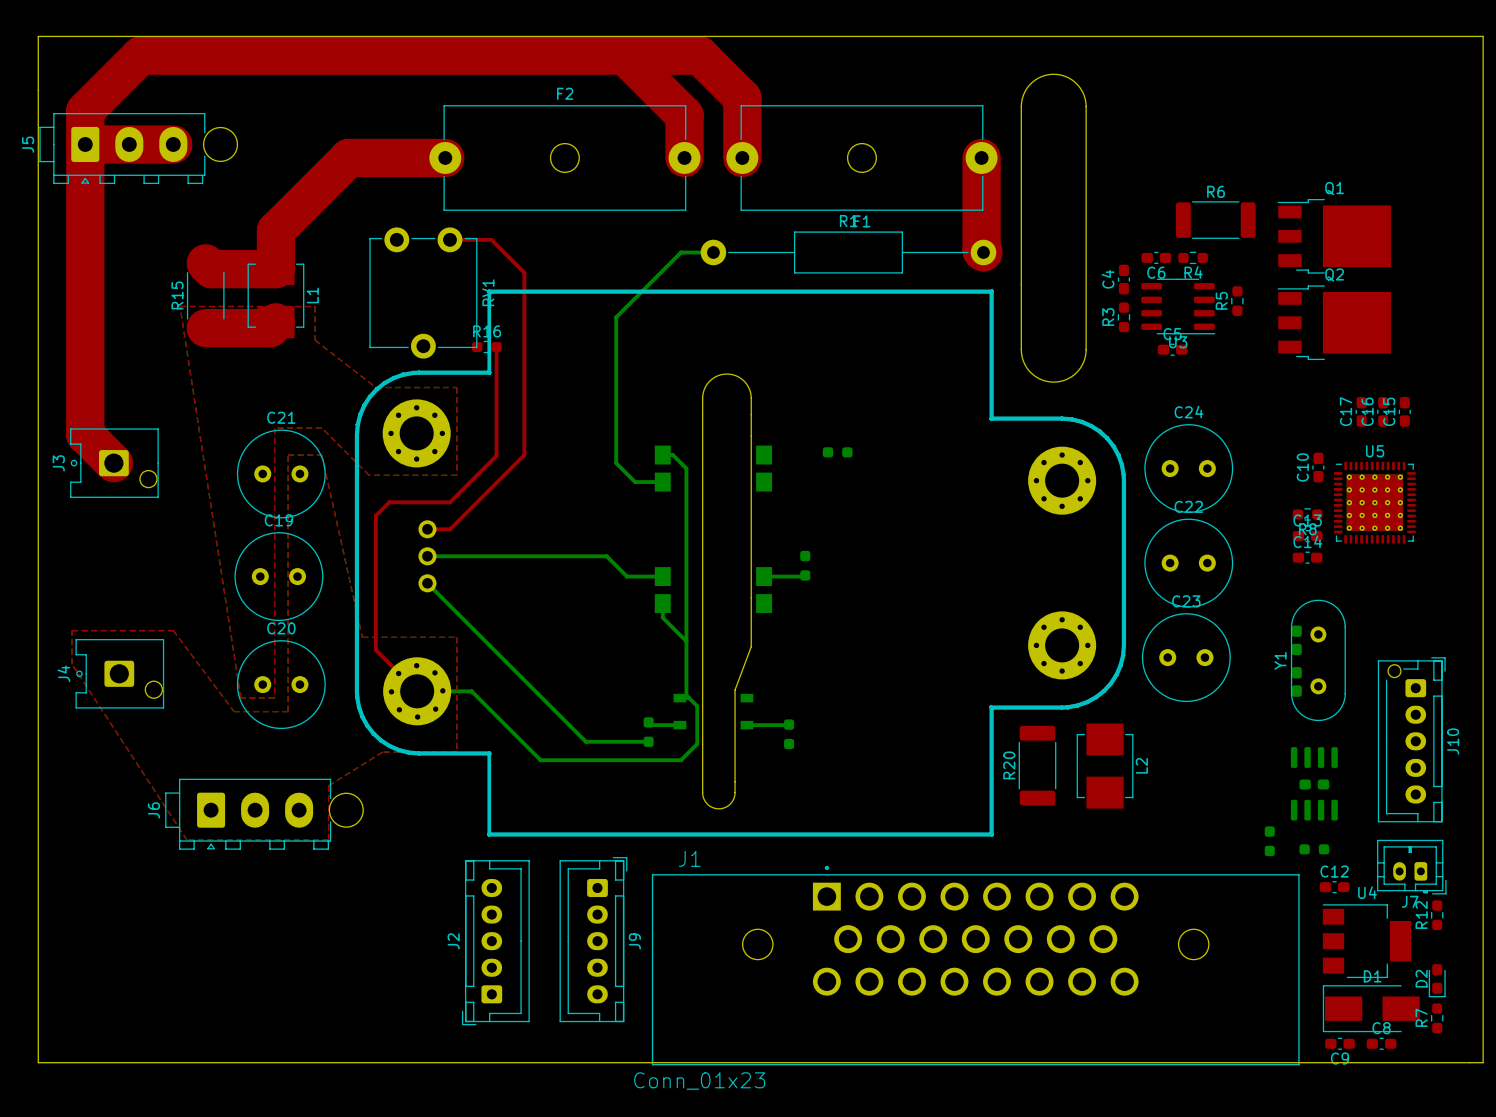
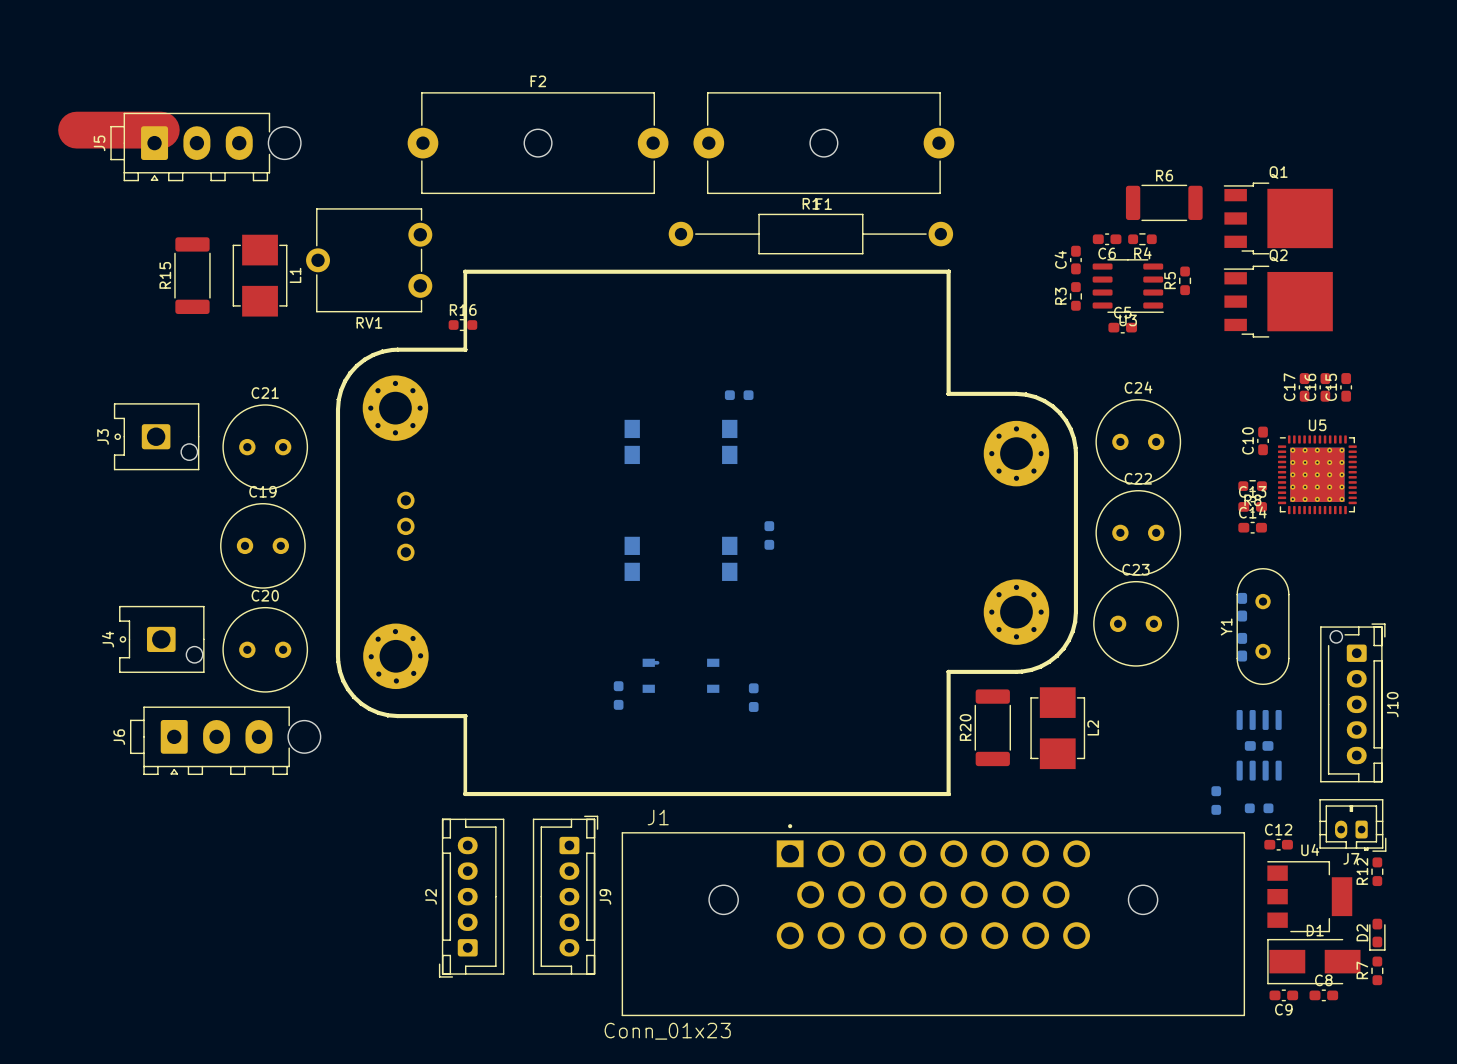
board edge: (38, 36) (1483, 36) (1483, 1062) (38, 1062) (38, 36) -> none
top track: (624, 55) (684, 115) (684, 157) -> none
board edge: (1021, 106) (1021, 353) (1025, 364) (1032, 373) (1045, 381) (1057, 381) (1075, 373) (1082, 364) (1085, 353) (1085, 102) (1082, 91) (1075, 82) (1065, 76) (1053, 74) (1038, 77) (1029, 85) (1023, 95) (1021, 106) -> none
J5 position: (138, 148) -> (205, 147)
top track: (445, 157) (348, 157) (275, 230) (275, 269) (211, 269) (205, 263) -> none
top track: (742, 157) (742, 98) (699, 55) (140, 55) (85, 110) (85, 434) (113, 463) -> none
top track: (981, 157) (981, 250) (983, 252) -> none
top track: (449, 239) (491, 239) (524, 272) (524, 455) (450, 529) -> none
bottom track: (713, 252) (681, 252) (616, 317) (616, 463) (635, 482) (662, 482) -> none
RV1 rotation: 0° (423, 293) -> 90° clockwise (369, 260)
top zone outline: (180, 306) (240, 698) (274, 698) (274, 428) (321, 428) (369, 475) (456, 475) (456, 387) (375, 387) (315, 340) (315, 306) (180, 306) -> none
top track: (275, 322) (270, 328) (205, 328) -> none
top track: (496, 347) (496, 455) (450, 502) (389, 502) (375, 515) (375, 650) (417, 691) -> none
board edge: (702, 398) (702, 792) (706, 803) (718, 808) (729, 804) (734, 796) (735, 690) (751, 646) (751, 398) (749, 389) (745, 382) (738, 376) (726, 374) (718, 375) (710, 380) (705, 387) (702, 398) -> none
part position: (837, 452) -> (739, 395)
top zone outline: (288, 455) (288, 711) (234, 711) (173, 630) (72, 630) (72, 664) (186, 839) (328, 839) (328, 785) (382, 752) (456, 752) (456, 637) (362, 637) (321, 455) (288, 455) -> none
bottom track: (662, 455) (672, 455) (686, 468) (686, 695) (697, 706) (697, 744) (681, 760) (540, 760) (471, 691) (417, 691) -> none
J3 position: (114, 463) -> (156, 436)
top track: (427, 529) (450, 529) -> none
bottom track: (427, 556) (606, 556) (627, 576) (662, 576) -> none
bottom track: (805, 575) (764, 576) -> none
bottom track: (427, 583) (585, 741) (648, 741) -> none
bottom track: (662, 603) (662, 617) (686, 641) -> none
J4 position: (119, 673) -> (161, 639)
bottom track: (648, 722) (651, 725) (679, 725) -> none
bottom track: (789, 724) (746, 725) -> none
J6 position: (264, 814) -> (225, 740)

